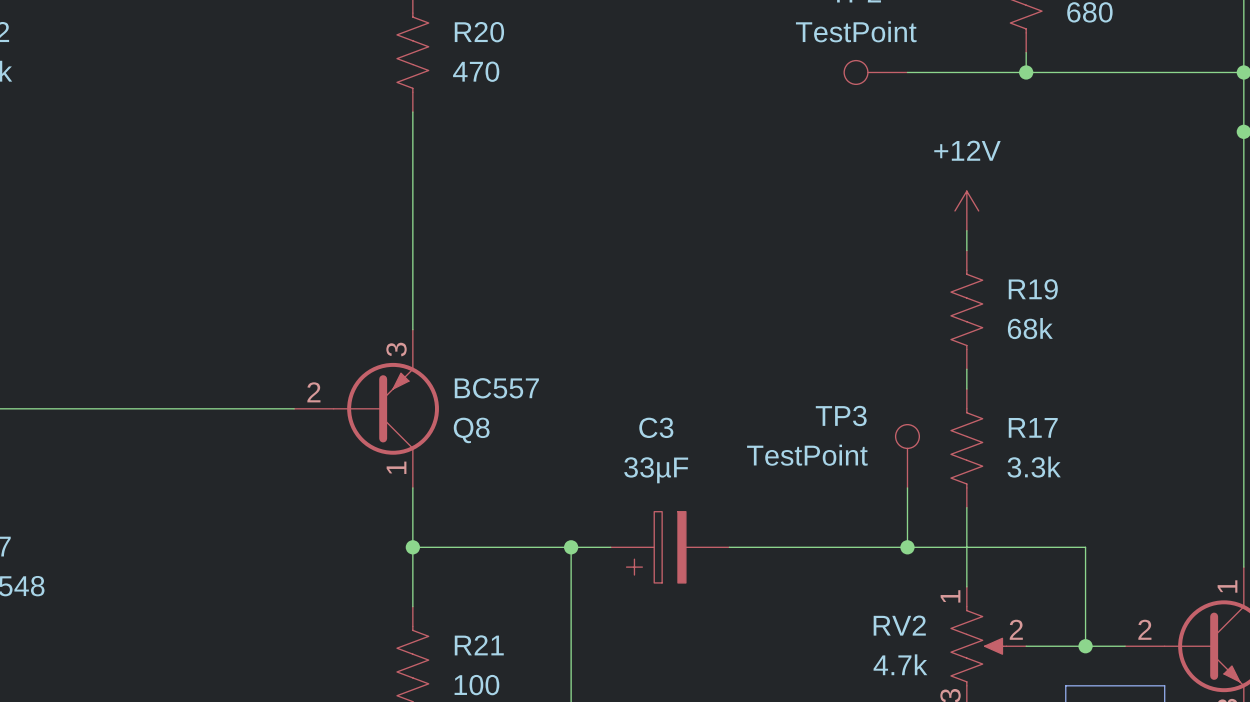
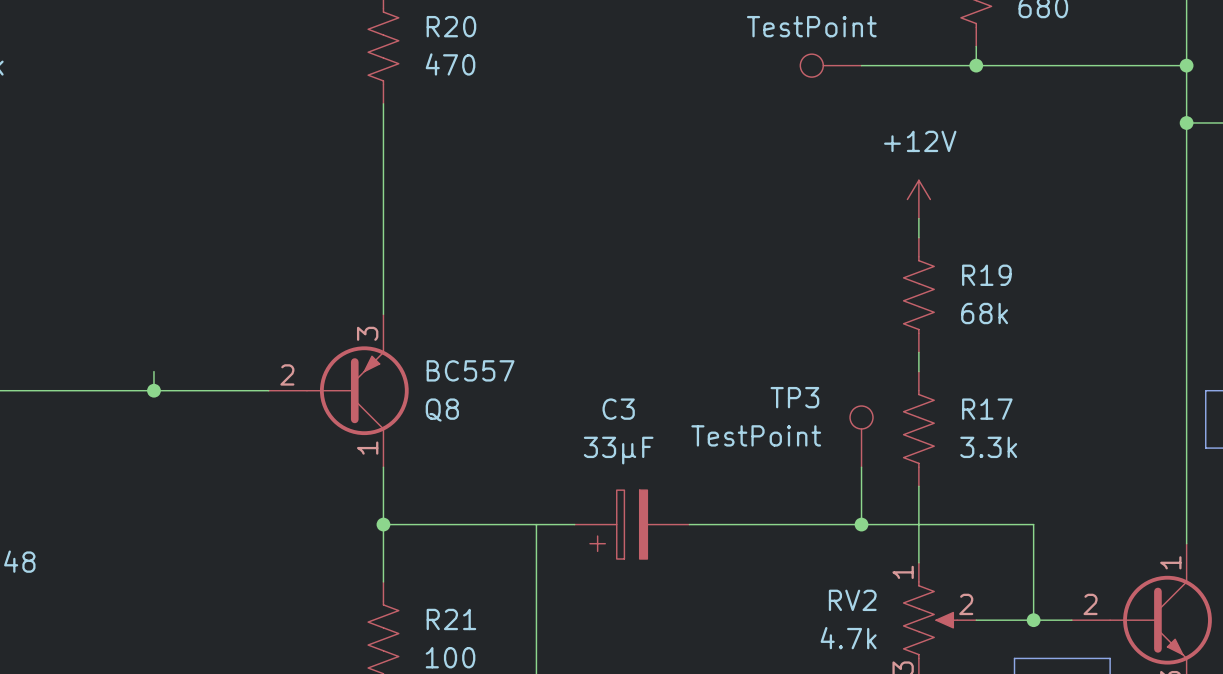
wire: none -> (153, 371) (153, 390)
junction: none -> (153, 390)
junction: (571, 547) -> none

